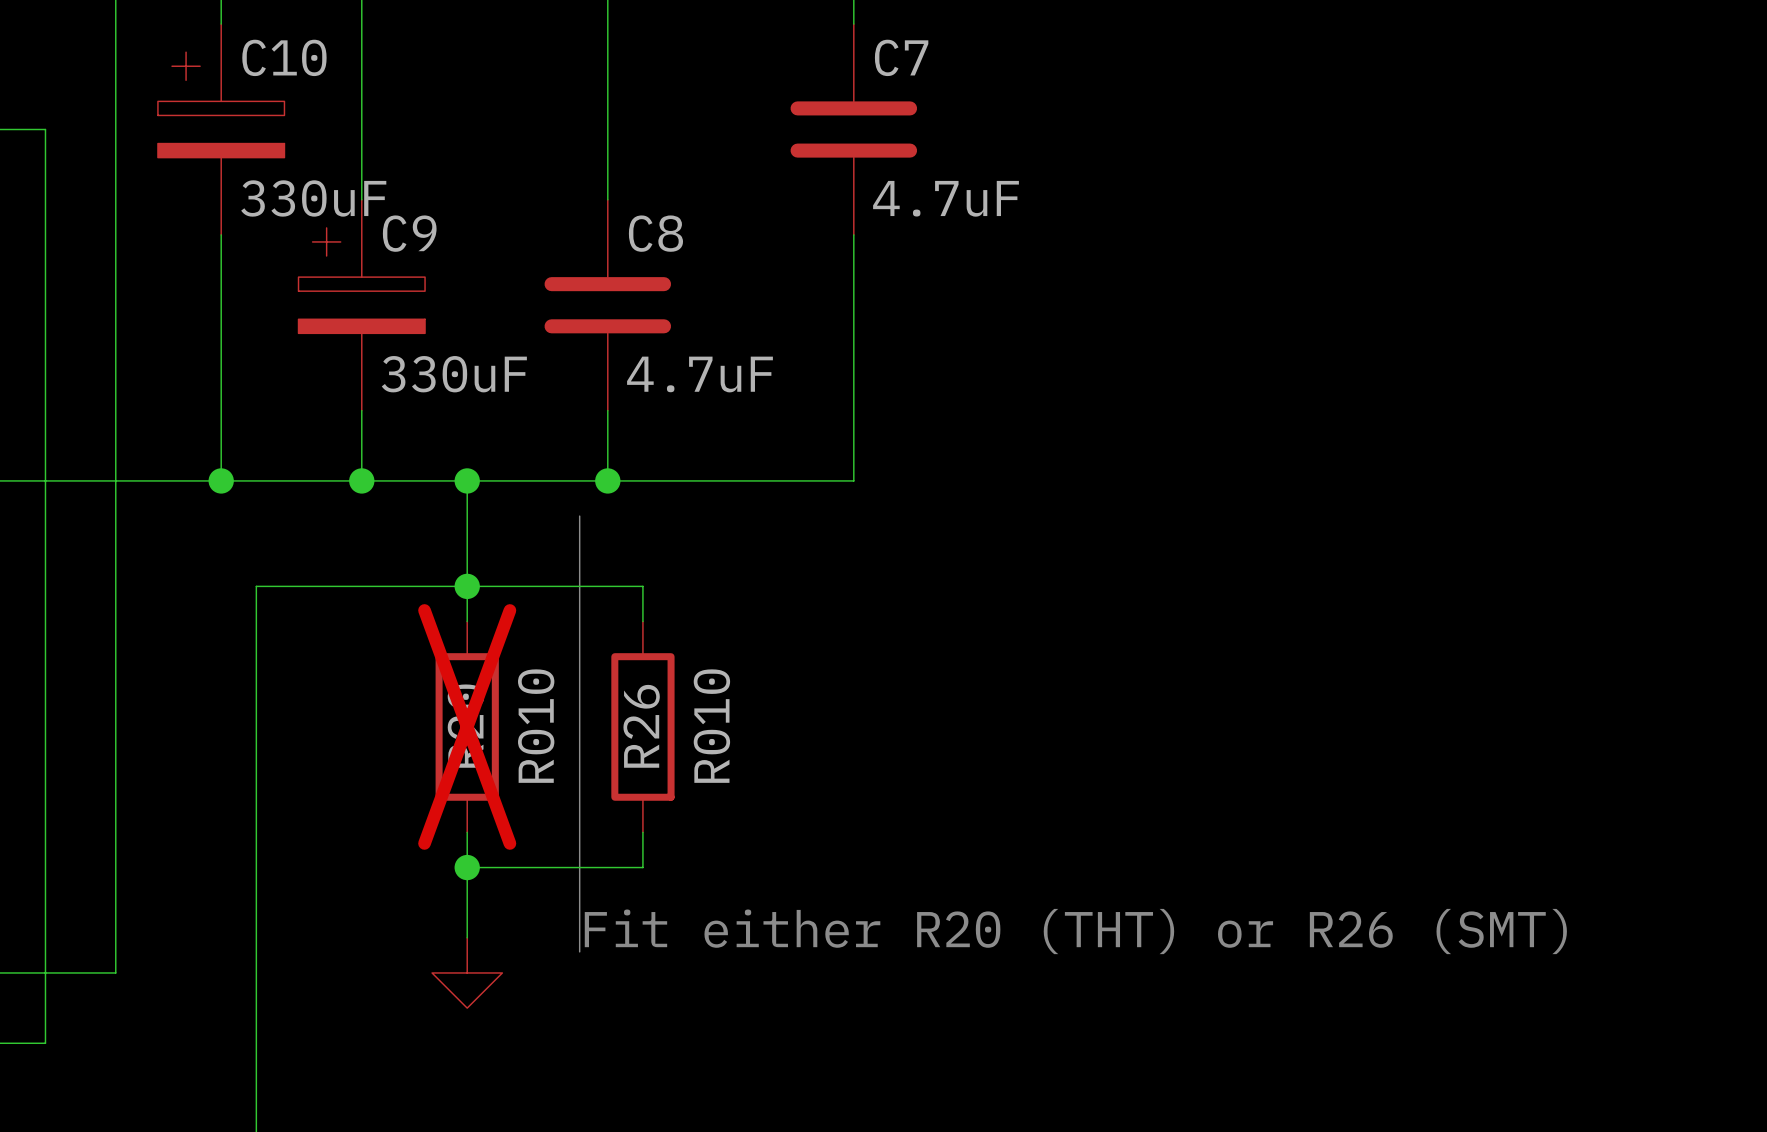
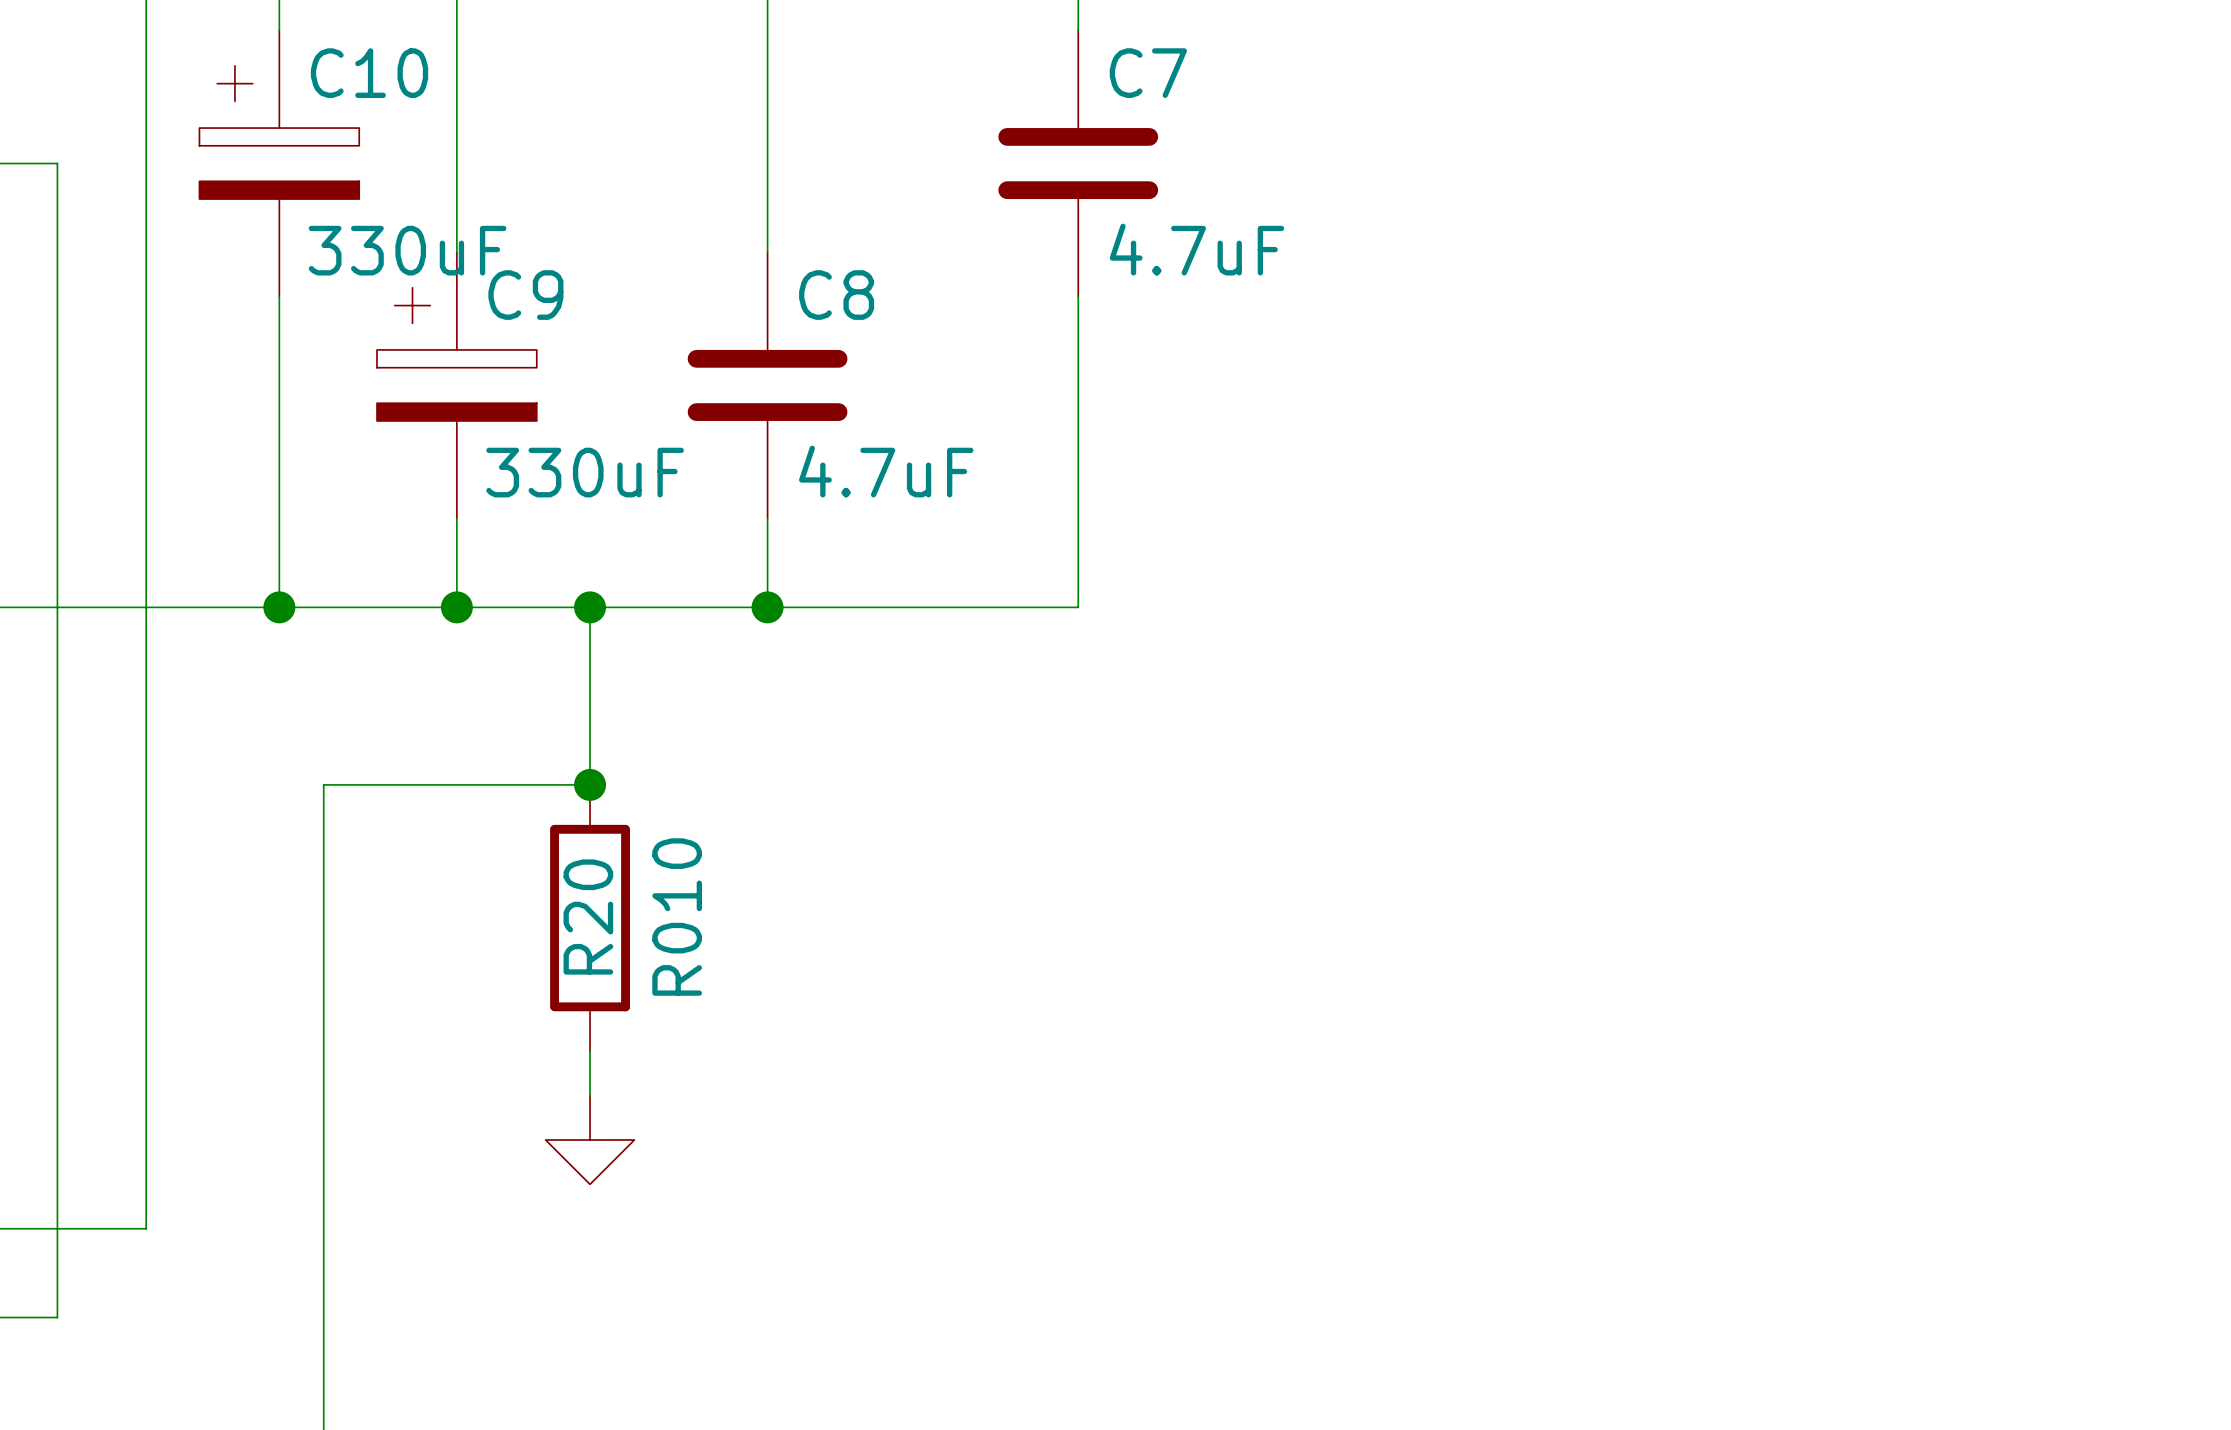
line: (579, 516) (579, 951) -> none
junction position: (467, 586) -> (590, 784)
wire: (256, 621) (256, 586) (642, 586) (642, 621) -> (323, 784) (590, 784)
R20 do-not-place cross: (467, 726) -> none
R26: R010 (642, 726) -> none
wire: (642, 832) (642, 867) (467, 867) (467, 937) -> none
junction: (467, 867) -> none
text: Fit either R20 (THT) or R26 (SMT) (1075, 931) -> none
power symbol position: (467, 972) -> (590, 1139)

